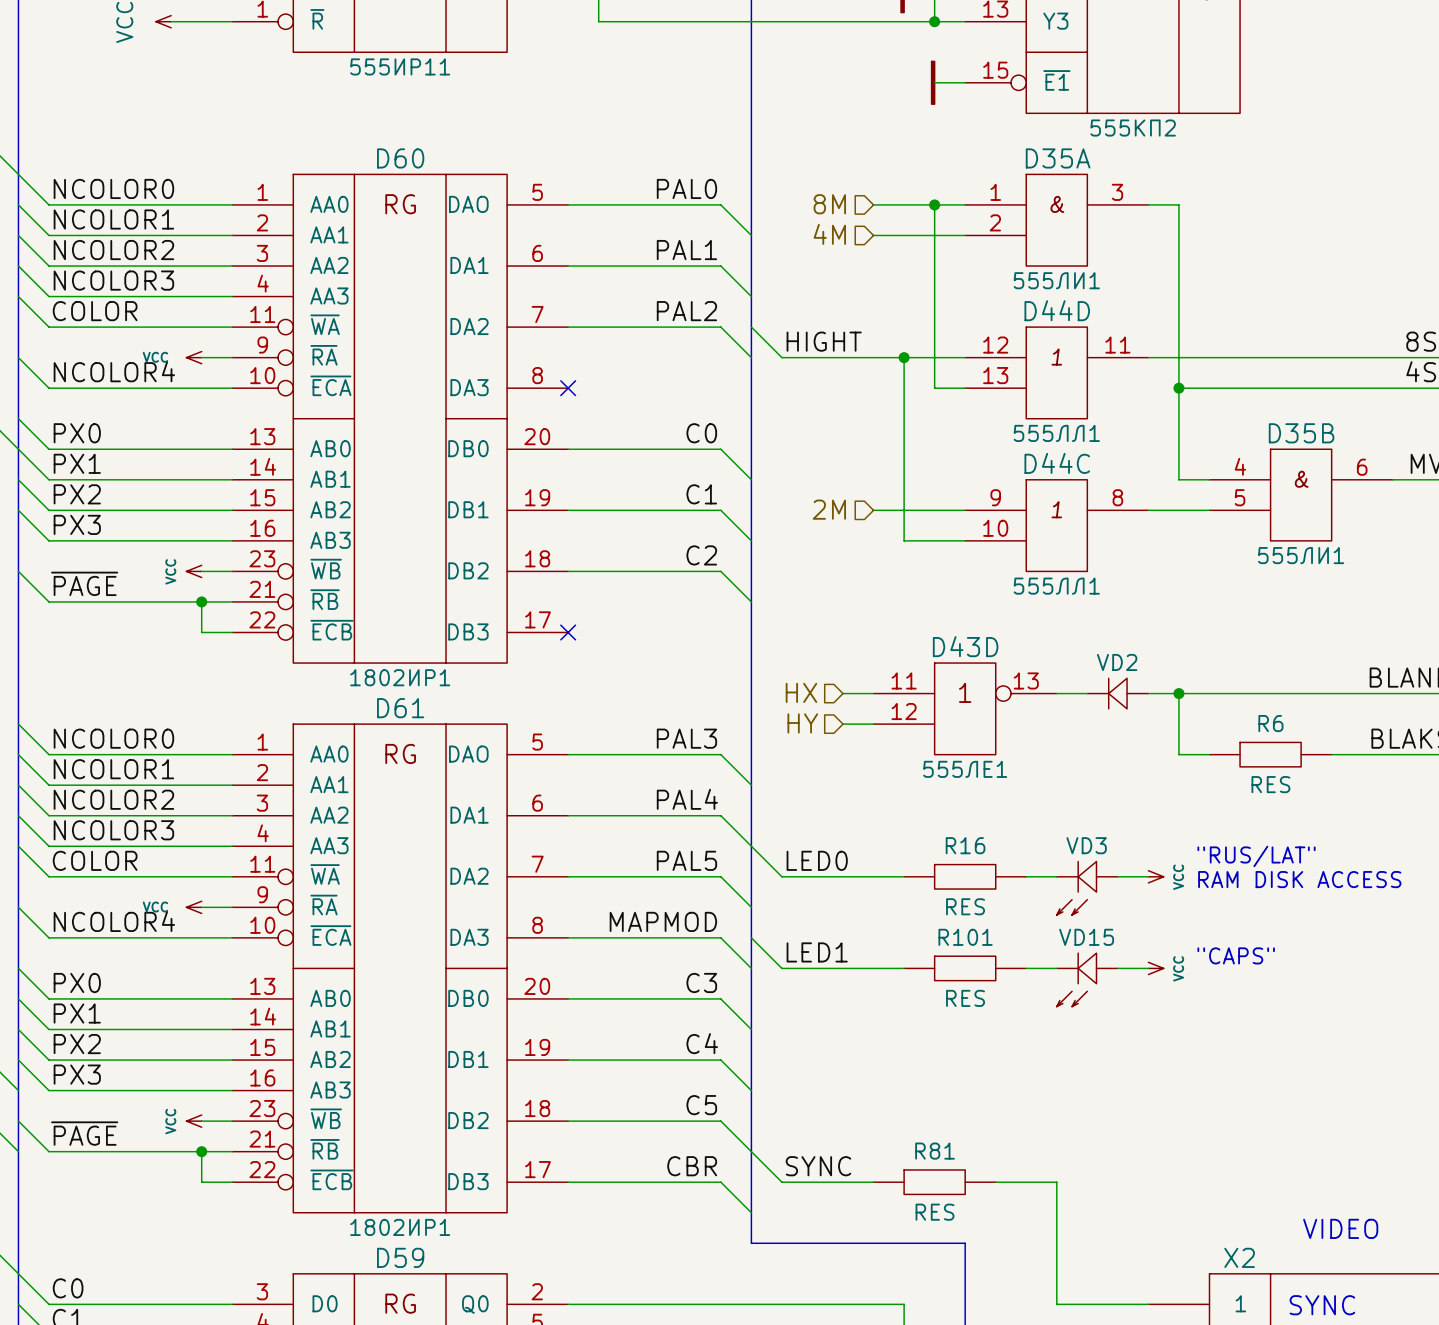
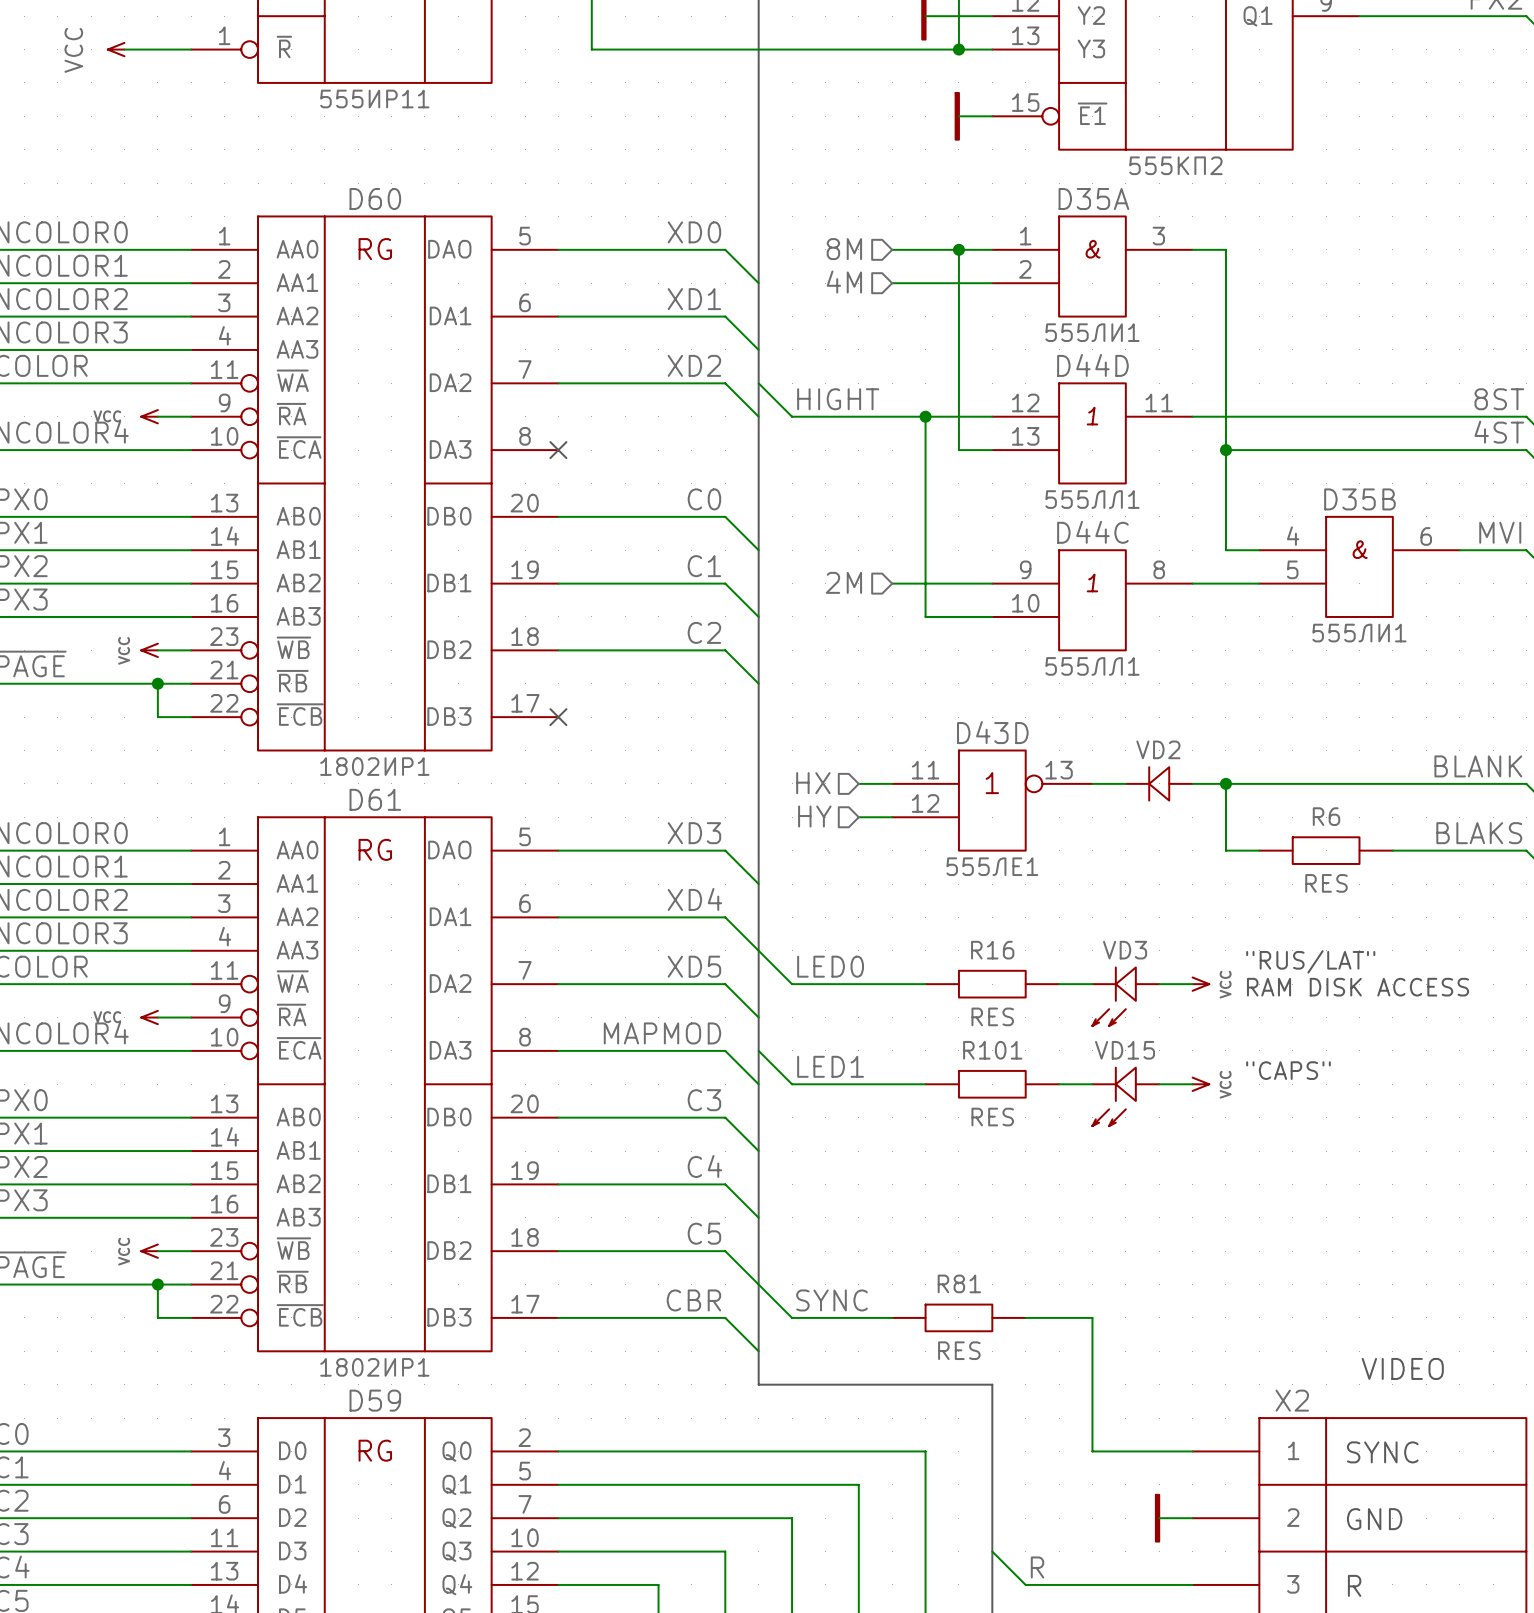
label: PAL0 (686, 188) -> XD0 (694, 232)
label: PAL1 (686, 250) -> XD1 (694, 299)
label: PAL2 (686, 311) -> XD2 (694, 365)
label: PAL3 (686, 738) -> XD3 (694, 833)
label: PAL4 (687, 799) -> XD4 (694, 899)
label: PAL5 (686, 860) -> XD5 (694, 966)

